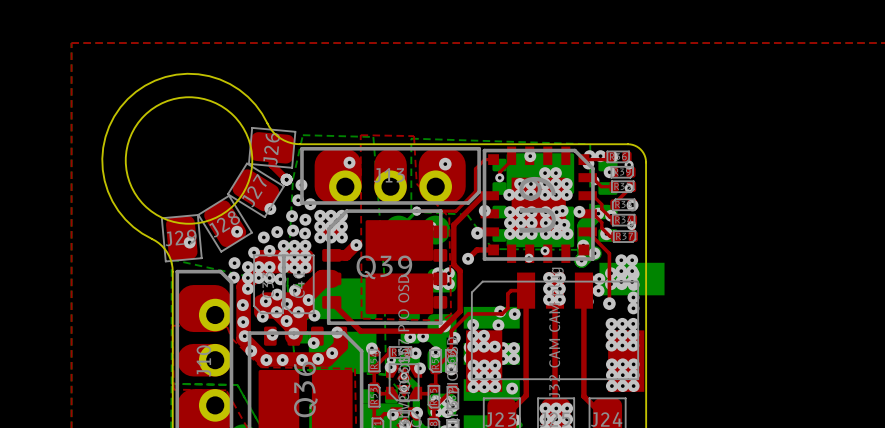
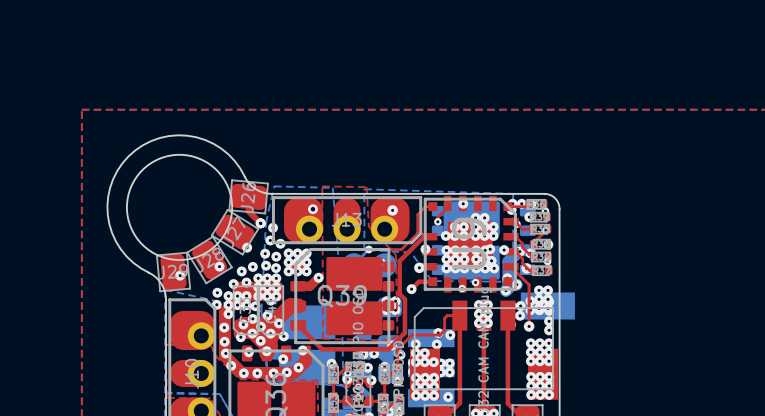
via: (349, 162) -> none
via: none -> (312, 209)

